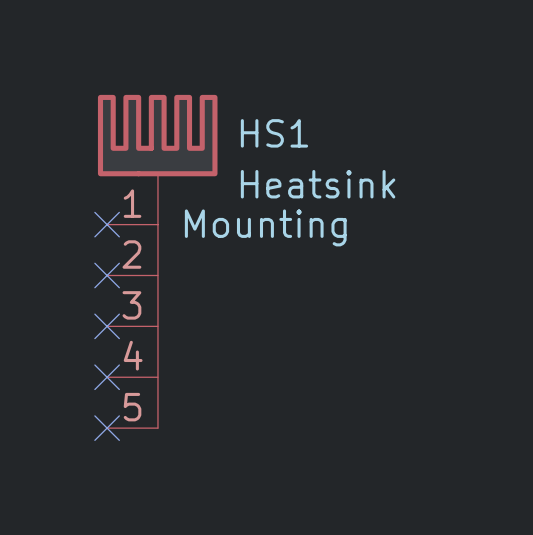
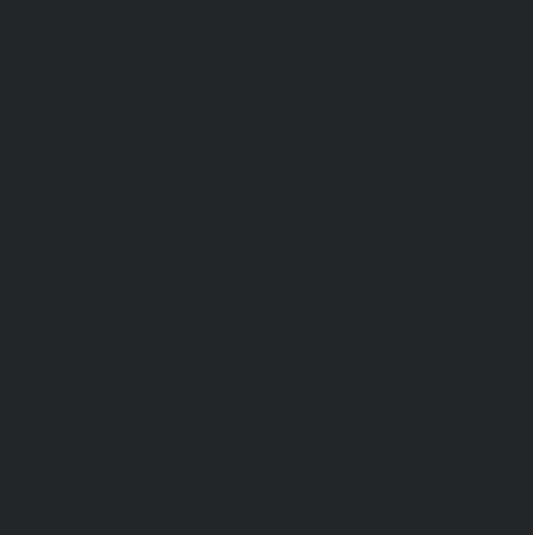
no-connect mark: (107, 224) -> none
HS1: Heatsink (157, 261) -> none
no-connect mark: (107, 275) -> none
no-connect mark: (107, 326) -> none
no-connect mark: (107, 377) -> none
no-connect mark: (107, 428) -> none

